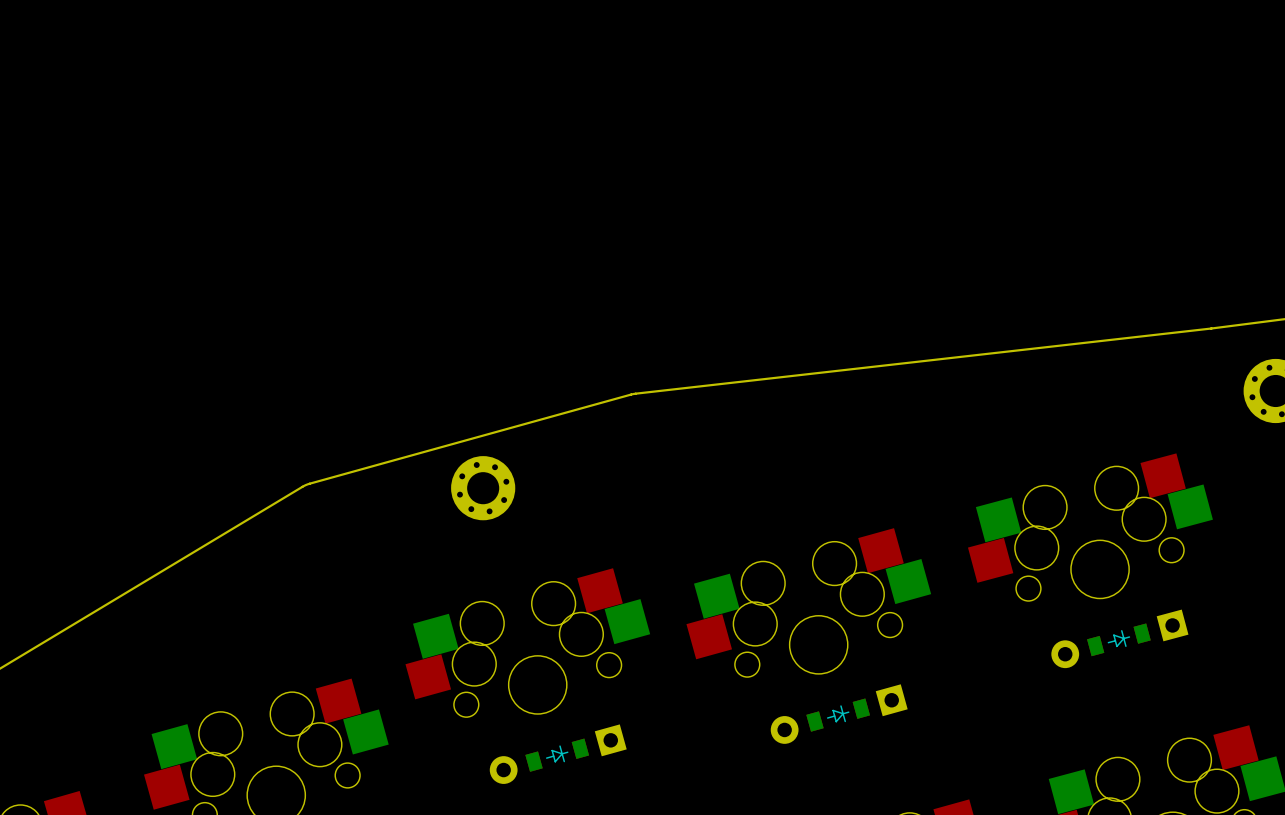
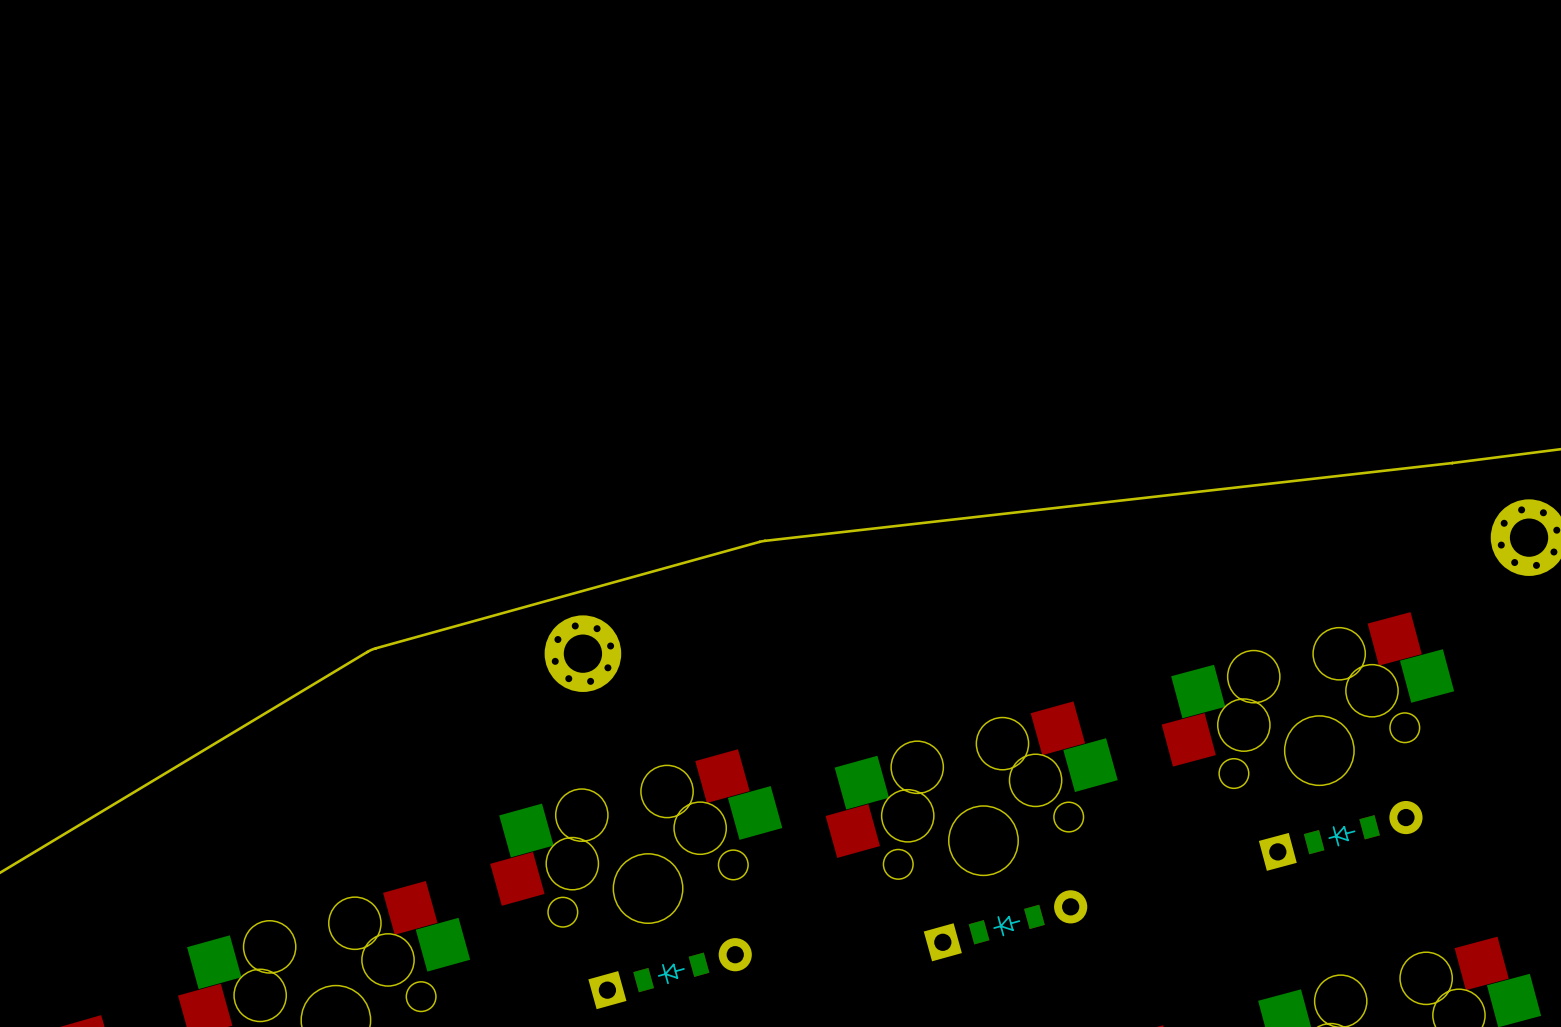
part rotation: 0° (1119, 638) -> 180° (1340, 835)
part rotation: 0° (839, 714) -> 180° (1005, 925)
part rotation: 0° (558, 754) -> 180° (670, 973)

